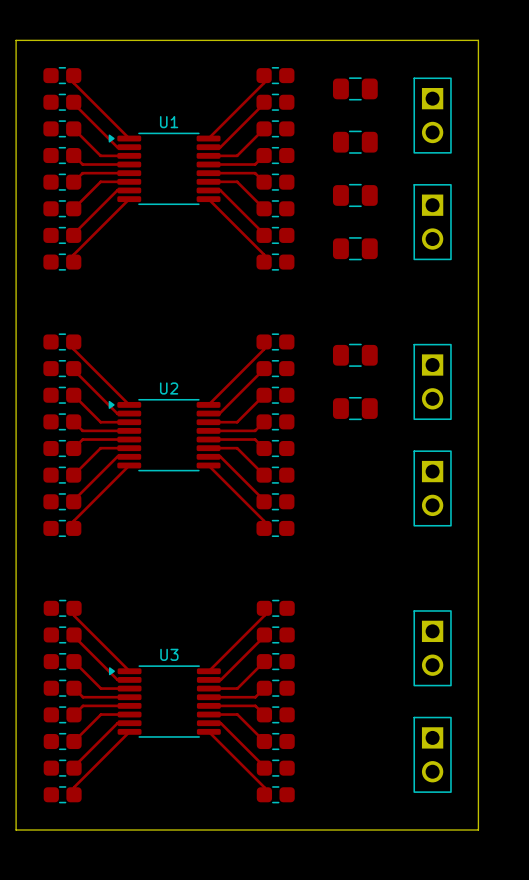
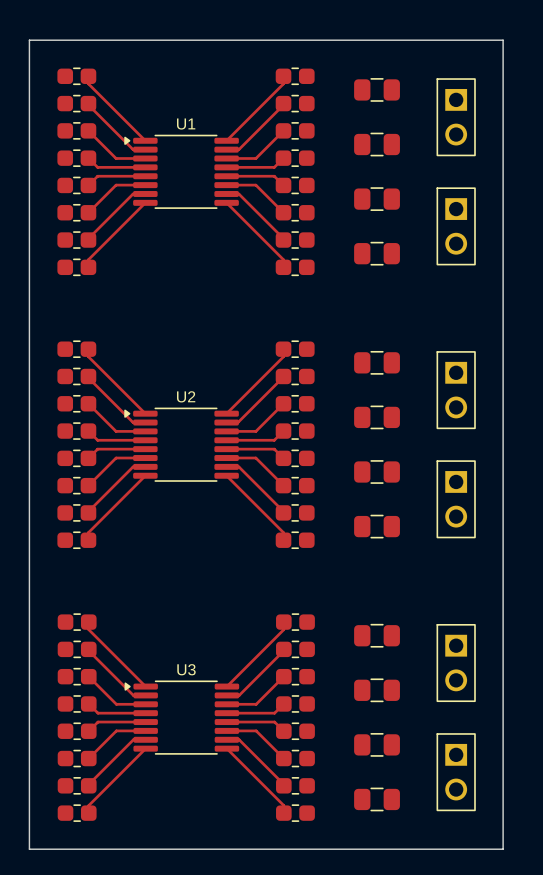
part: none -> (377, 472)
part: none -> (377, 526)
part: none -> (377, 635)
part: none -> (377, 690)
part: none -> (377, 744)
part: none -> (377, 799)

